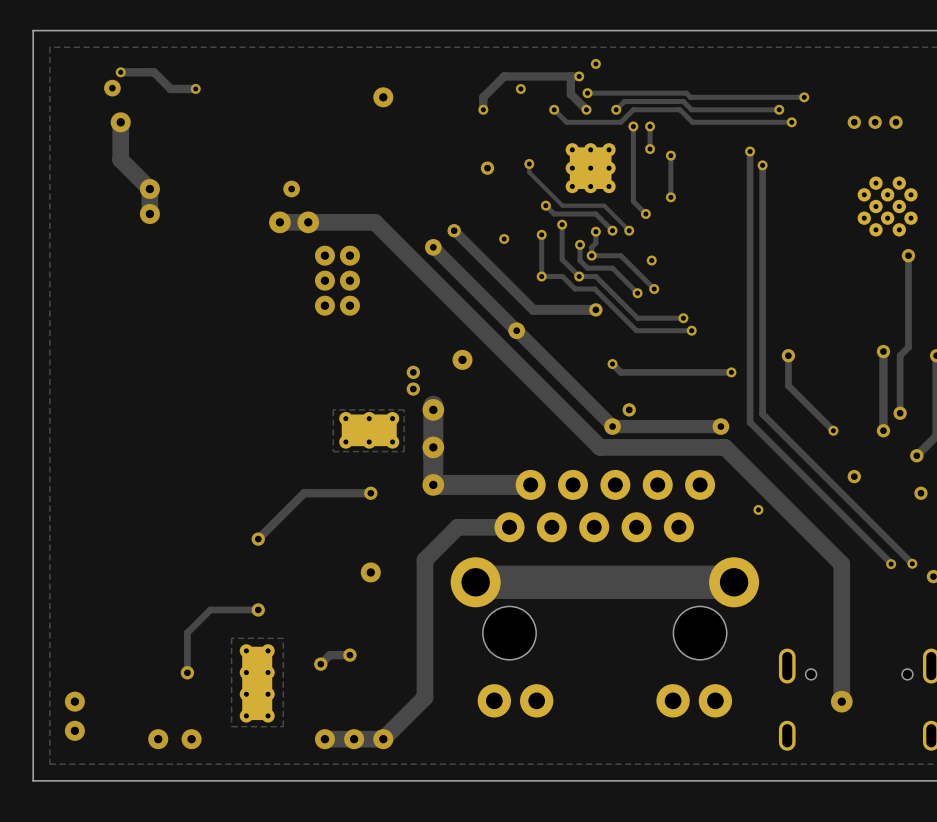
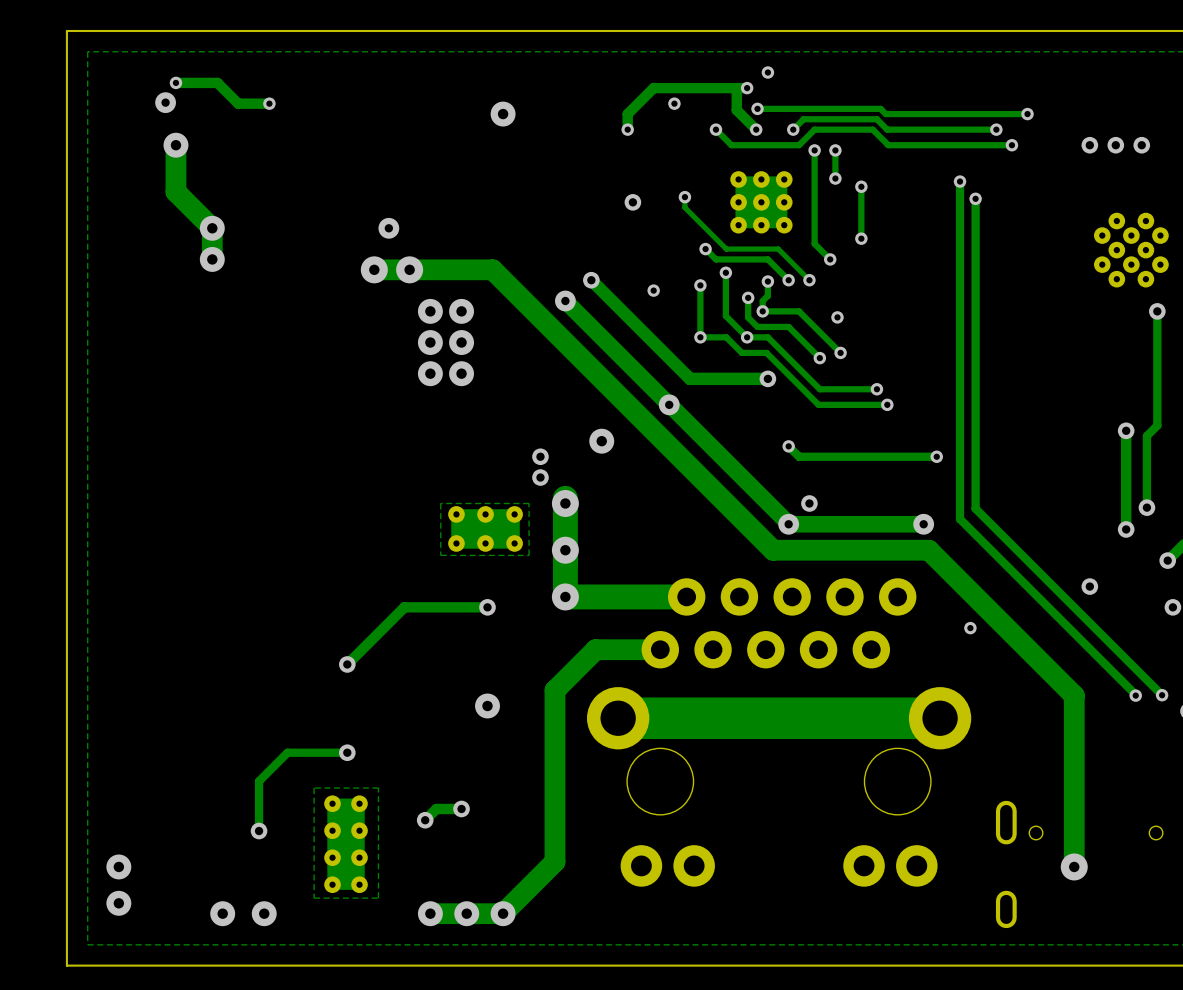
track: (788, 355) (788, 385) (833, 430) -> none
via: (788, 355) -> none
via: (833, 430) -> none

